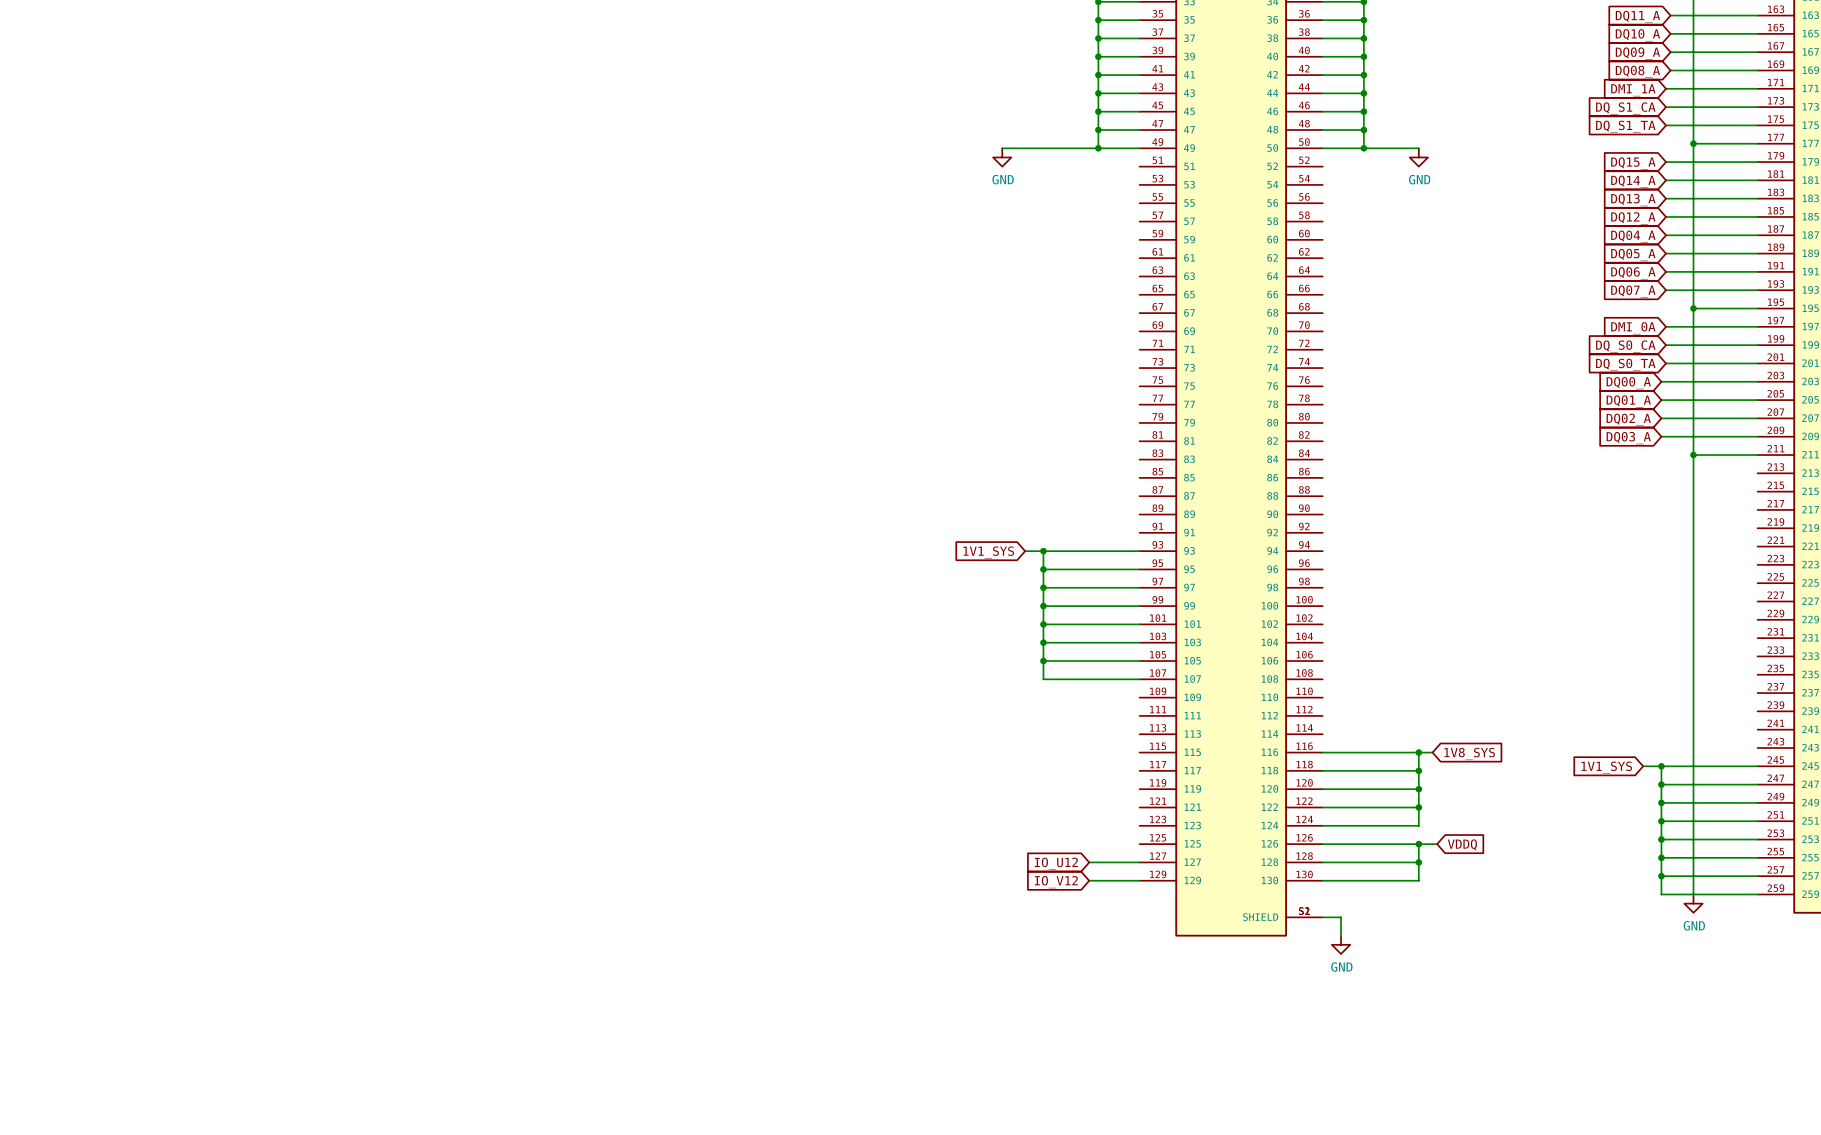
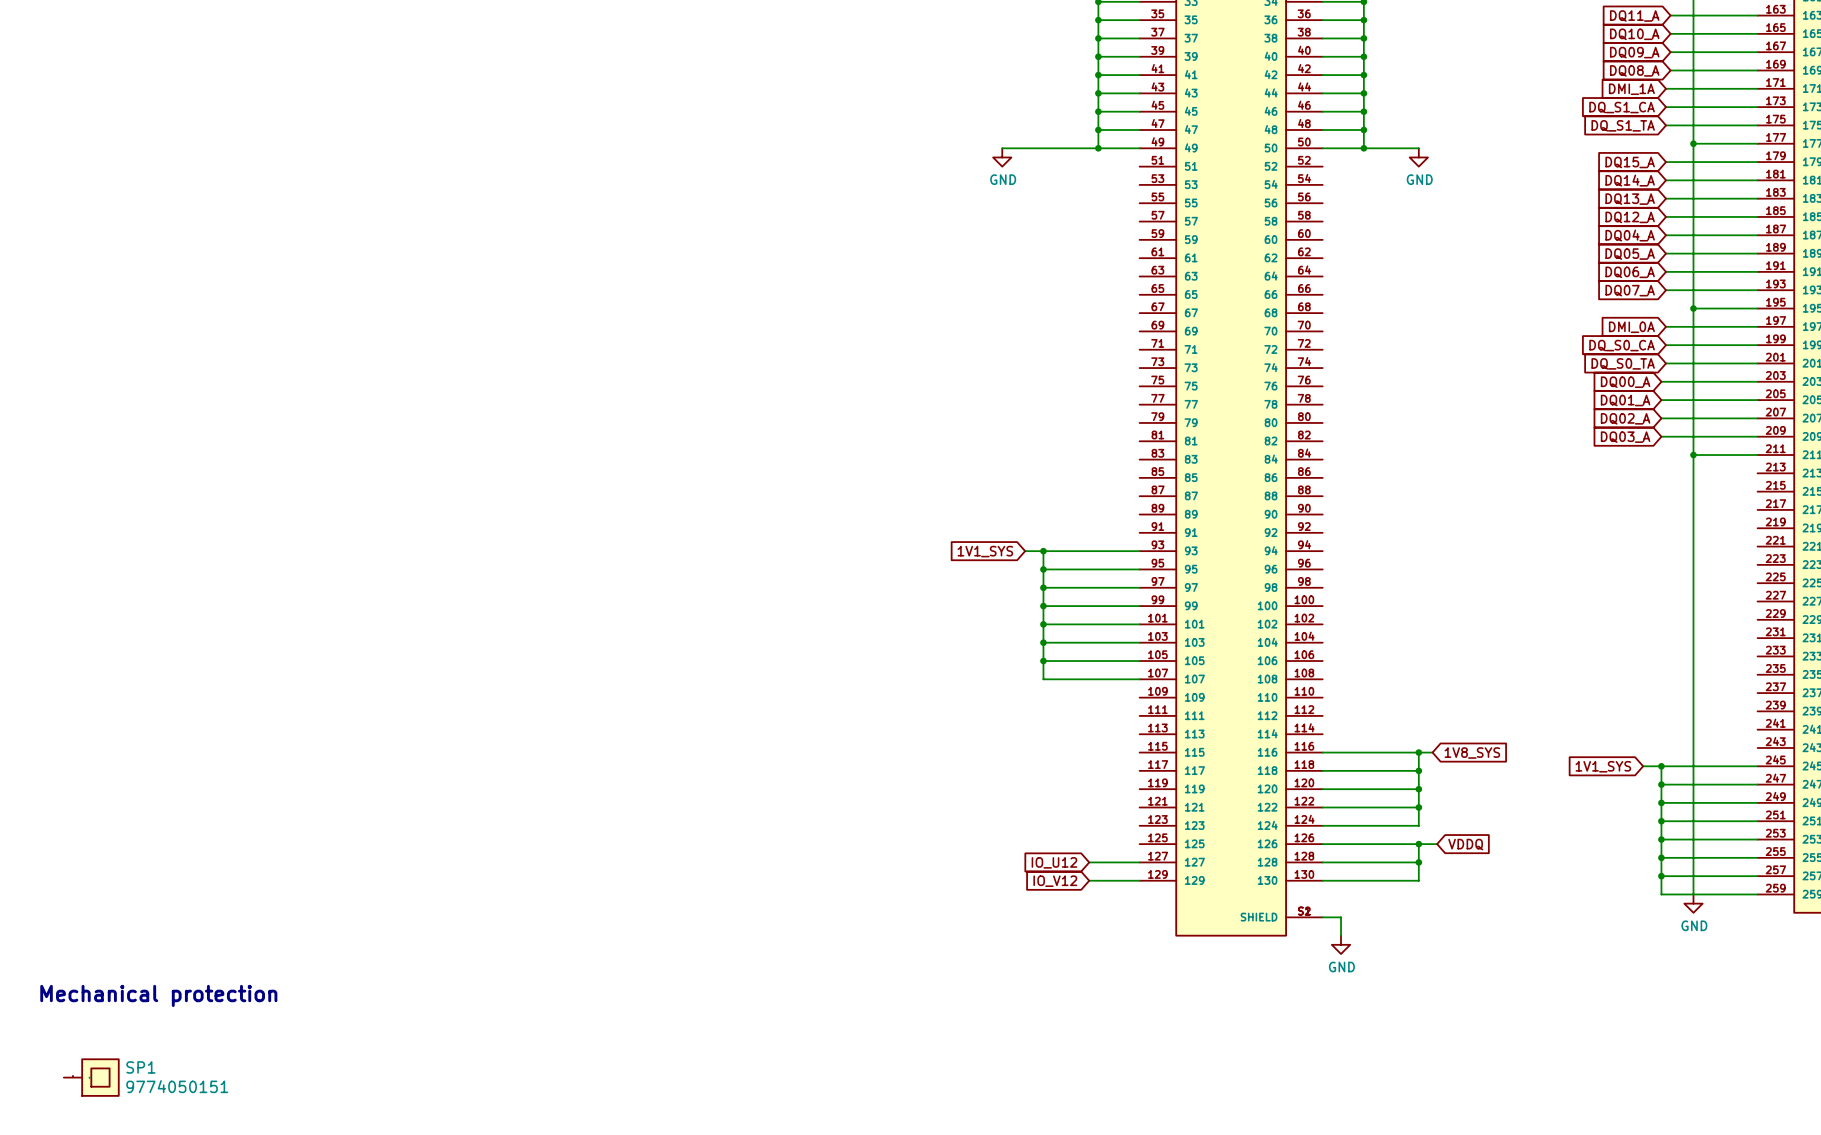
text: none -> Mechanical protection (158, 995)
SP1: none -> 9774050151 (91, 1077)

